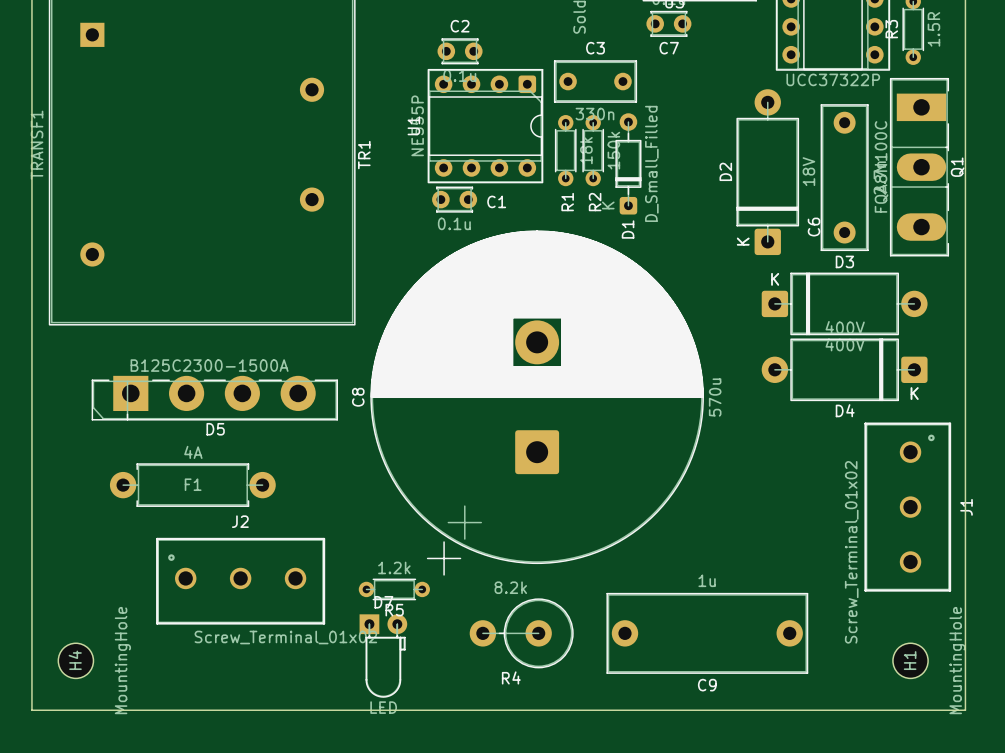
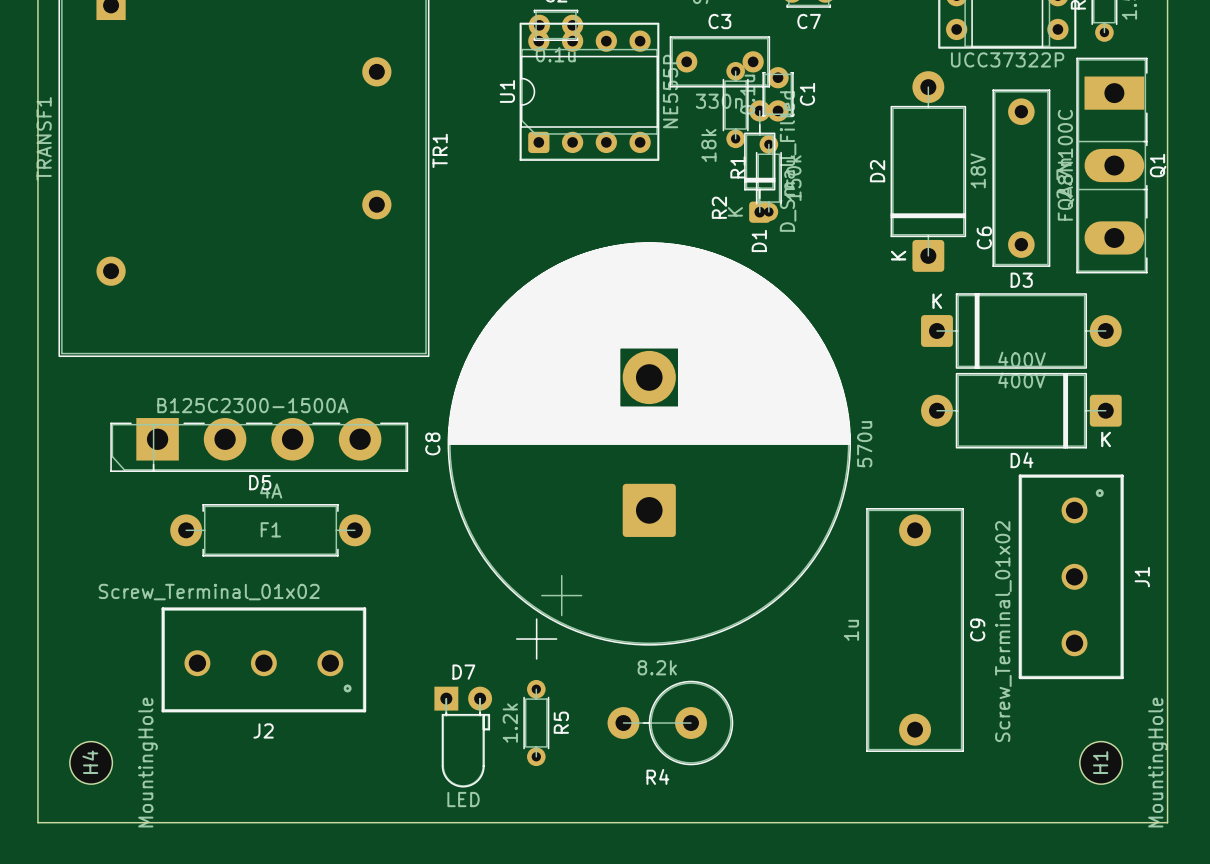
U1 rotation: 0° (485, 126) -> 180° (589, 91)
R1 position: (565, 150) -> (735, 105)
R2 position: (593, 150) -> (768, 178)
C1 rotation: 0° (454, 199) -> 90° clockwise (778, 94)
C1 position: (454, 199) -> (778, 94)
F1 position: (192, 485) -> (270, 530)
J1 position: (907, 507) -> (1071, 576)
R5 value position: 1.2k (394, 567) -> 1.2k (510, 723)
C9 value position: 1u (707, 580) -> 1u (851, 630)
J2 rotation: 0° (240, 581) -> 180° (263, 659)
R5 rotation: 0° (394, 589) -> 90° clockwise (536, 723)
R5 position: (394, 589) -> (536, 723)
R5 name position: R5 (394, 610) -> R5 (561, 722)
R4 position: (521, 633) -> (670, 723)
C9 rotation: 0° (707, 633) -> 90° clockwise (915, 629)
D7 position: (383, 656) -> (463, 737)
C9 name position: C9 (707, 685) -> C9 (977, 629)

